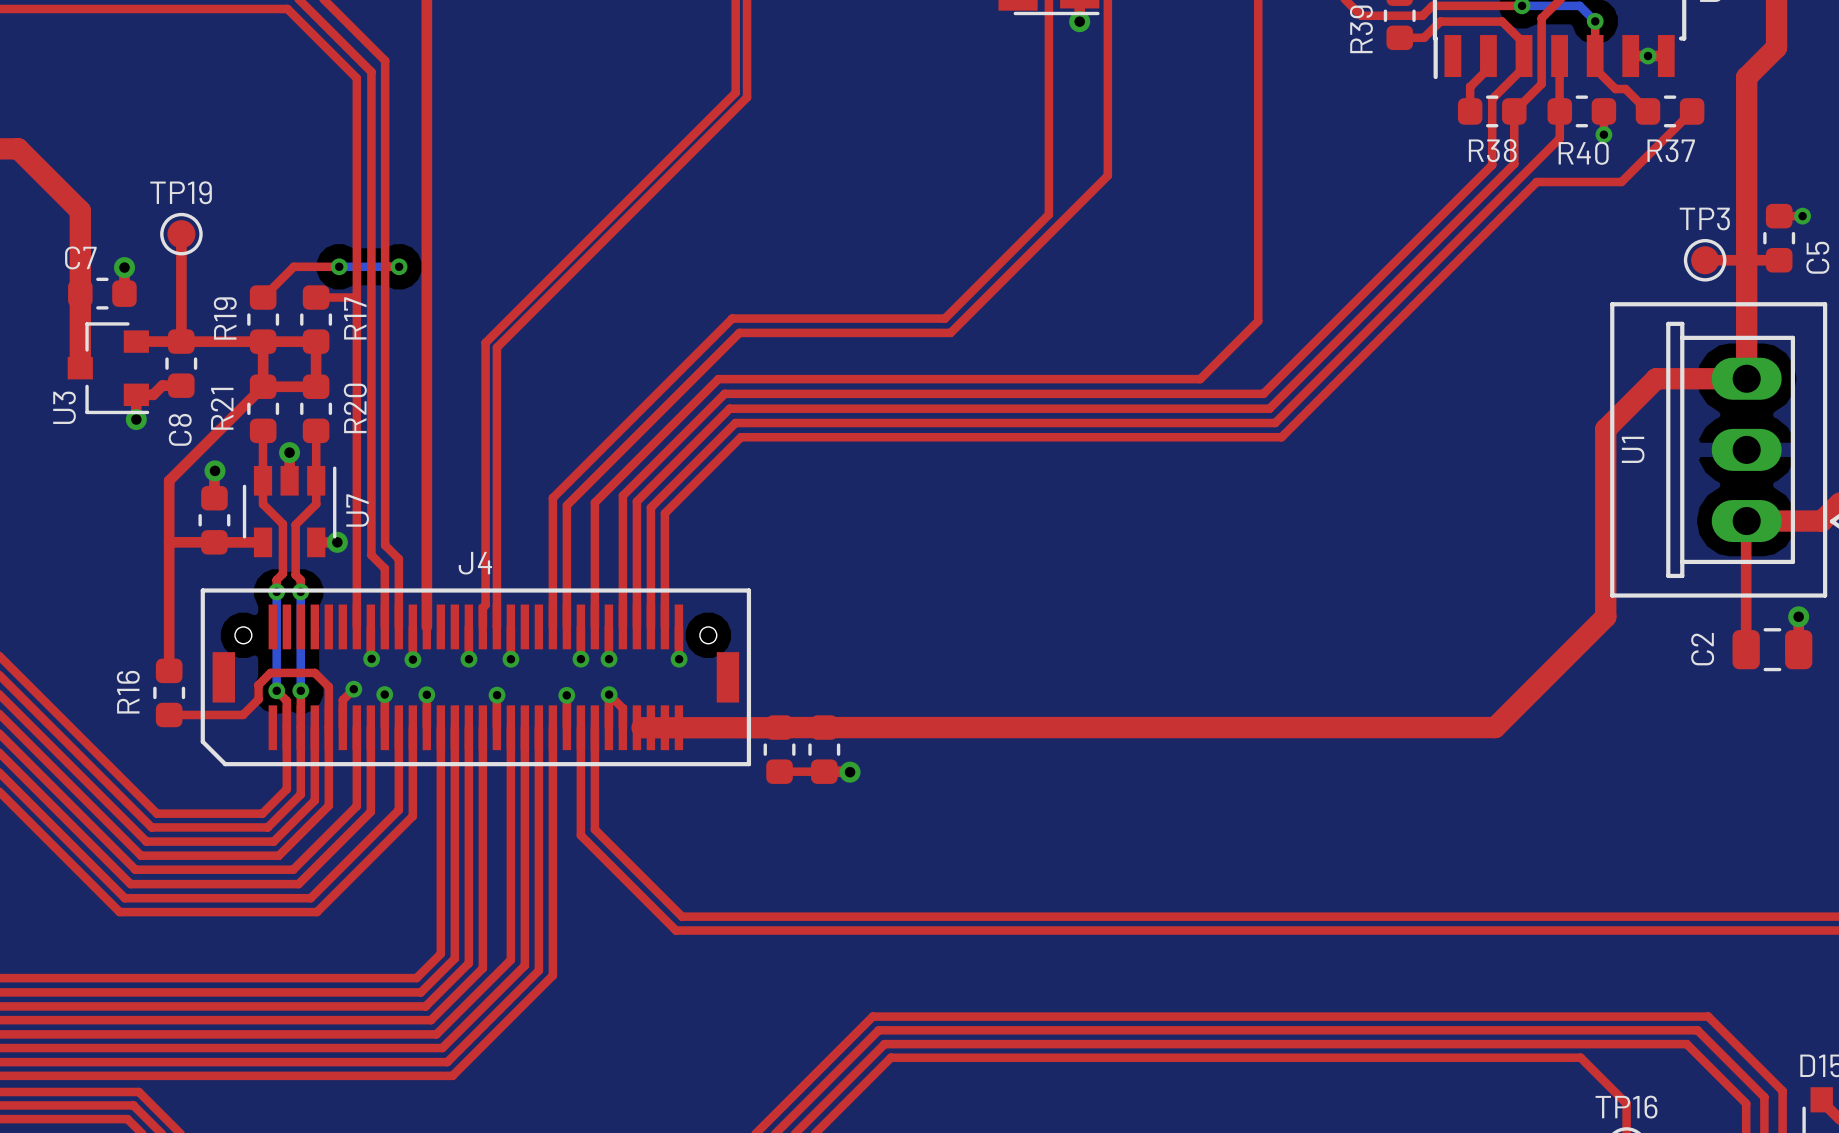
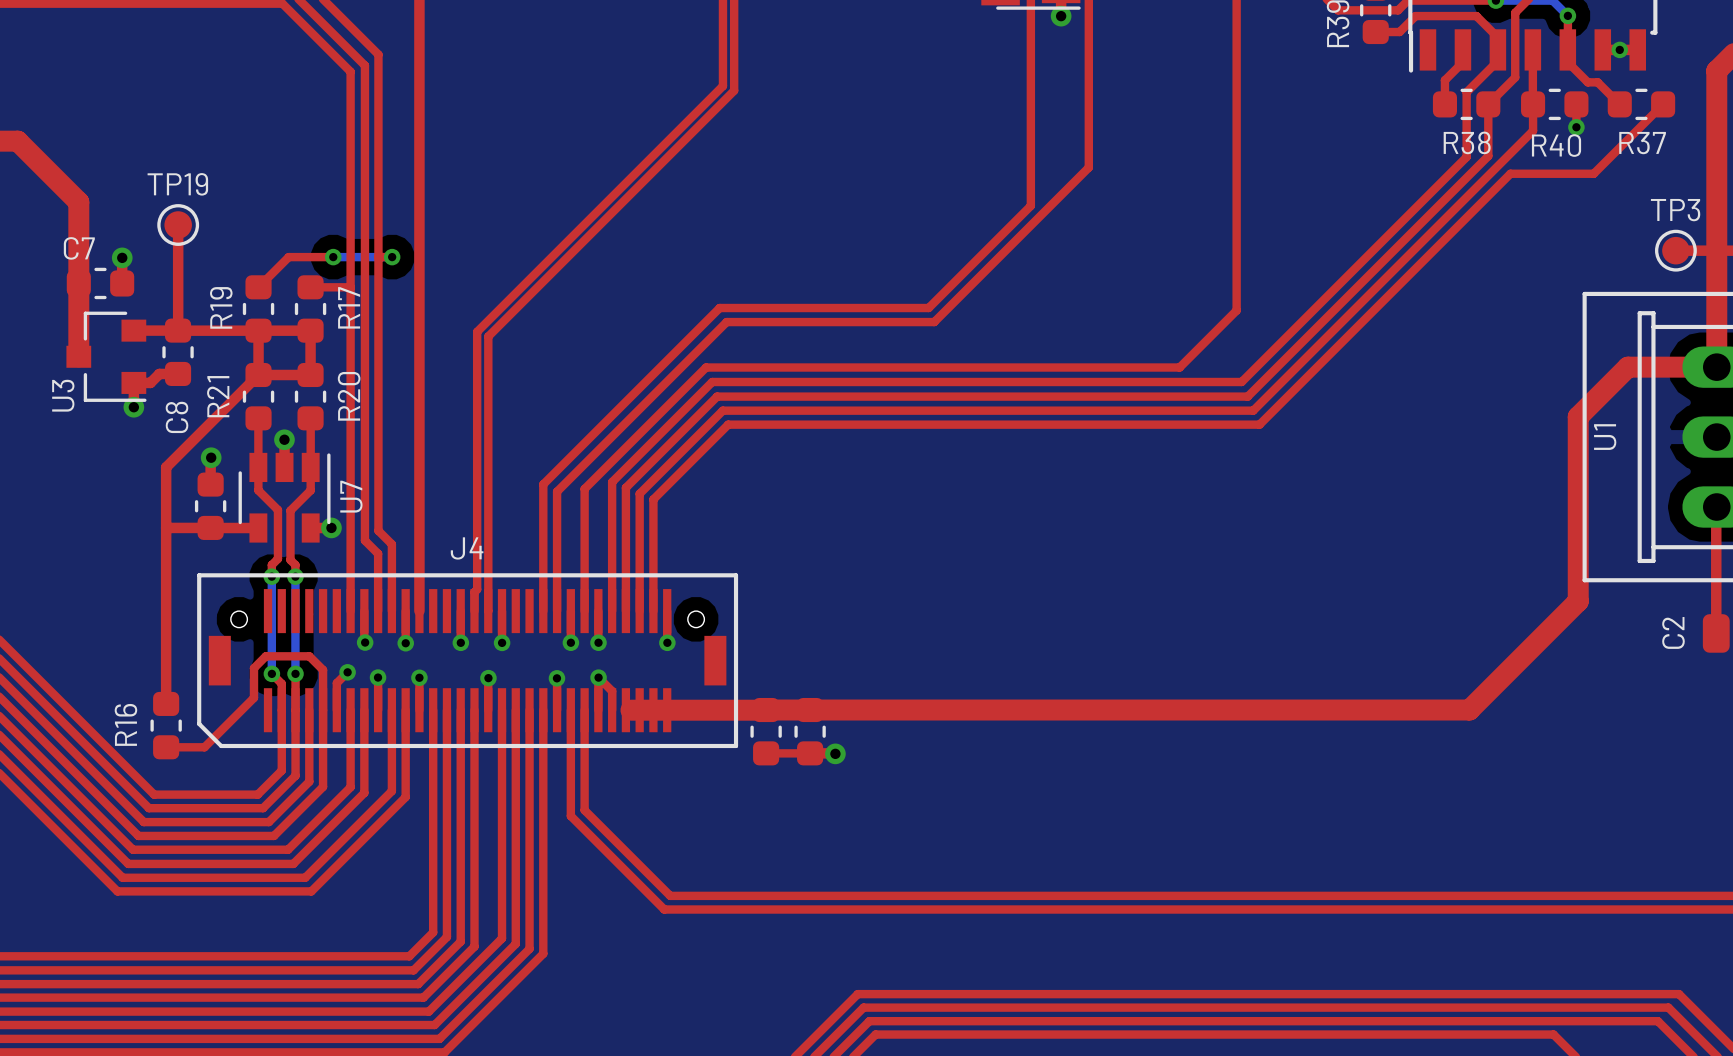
top track: none -> (166, 654) (166, 703)
R16 position: (169, 692) -> (166, 725)
top track: (258, 699) (242, 714) (169, 714) -> (253, 682) (253, 697) (204, 747) (166, 747)

